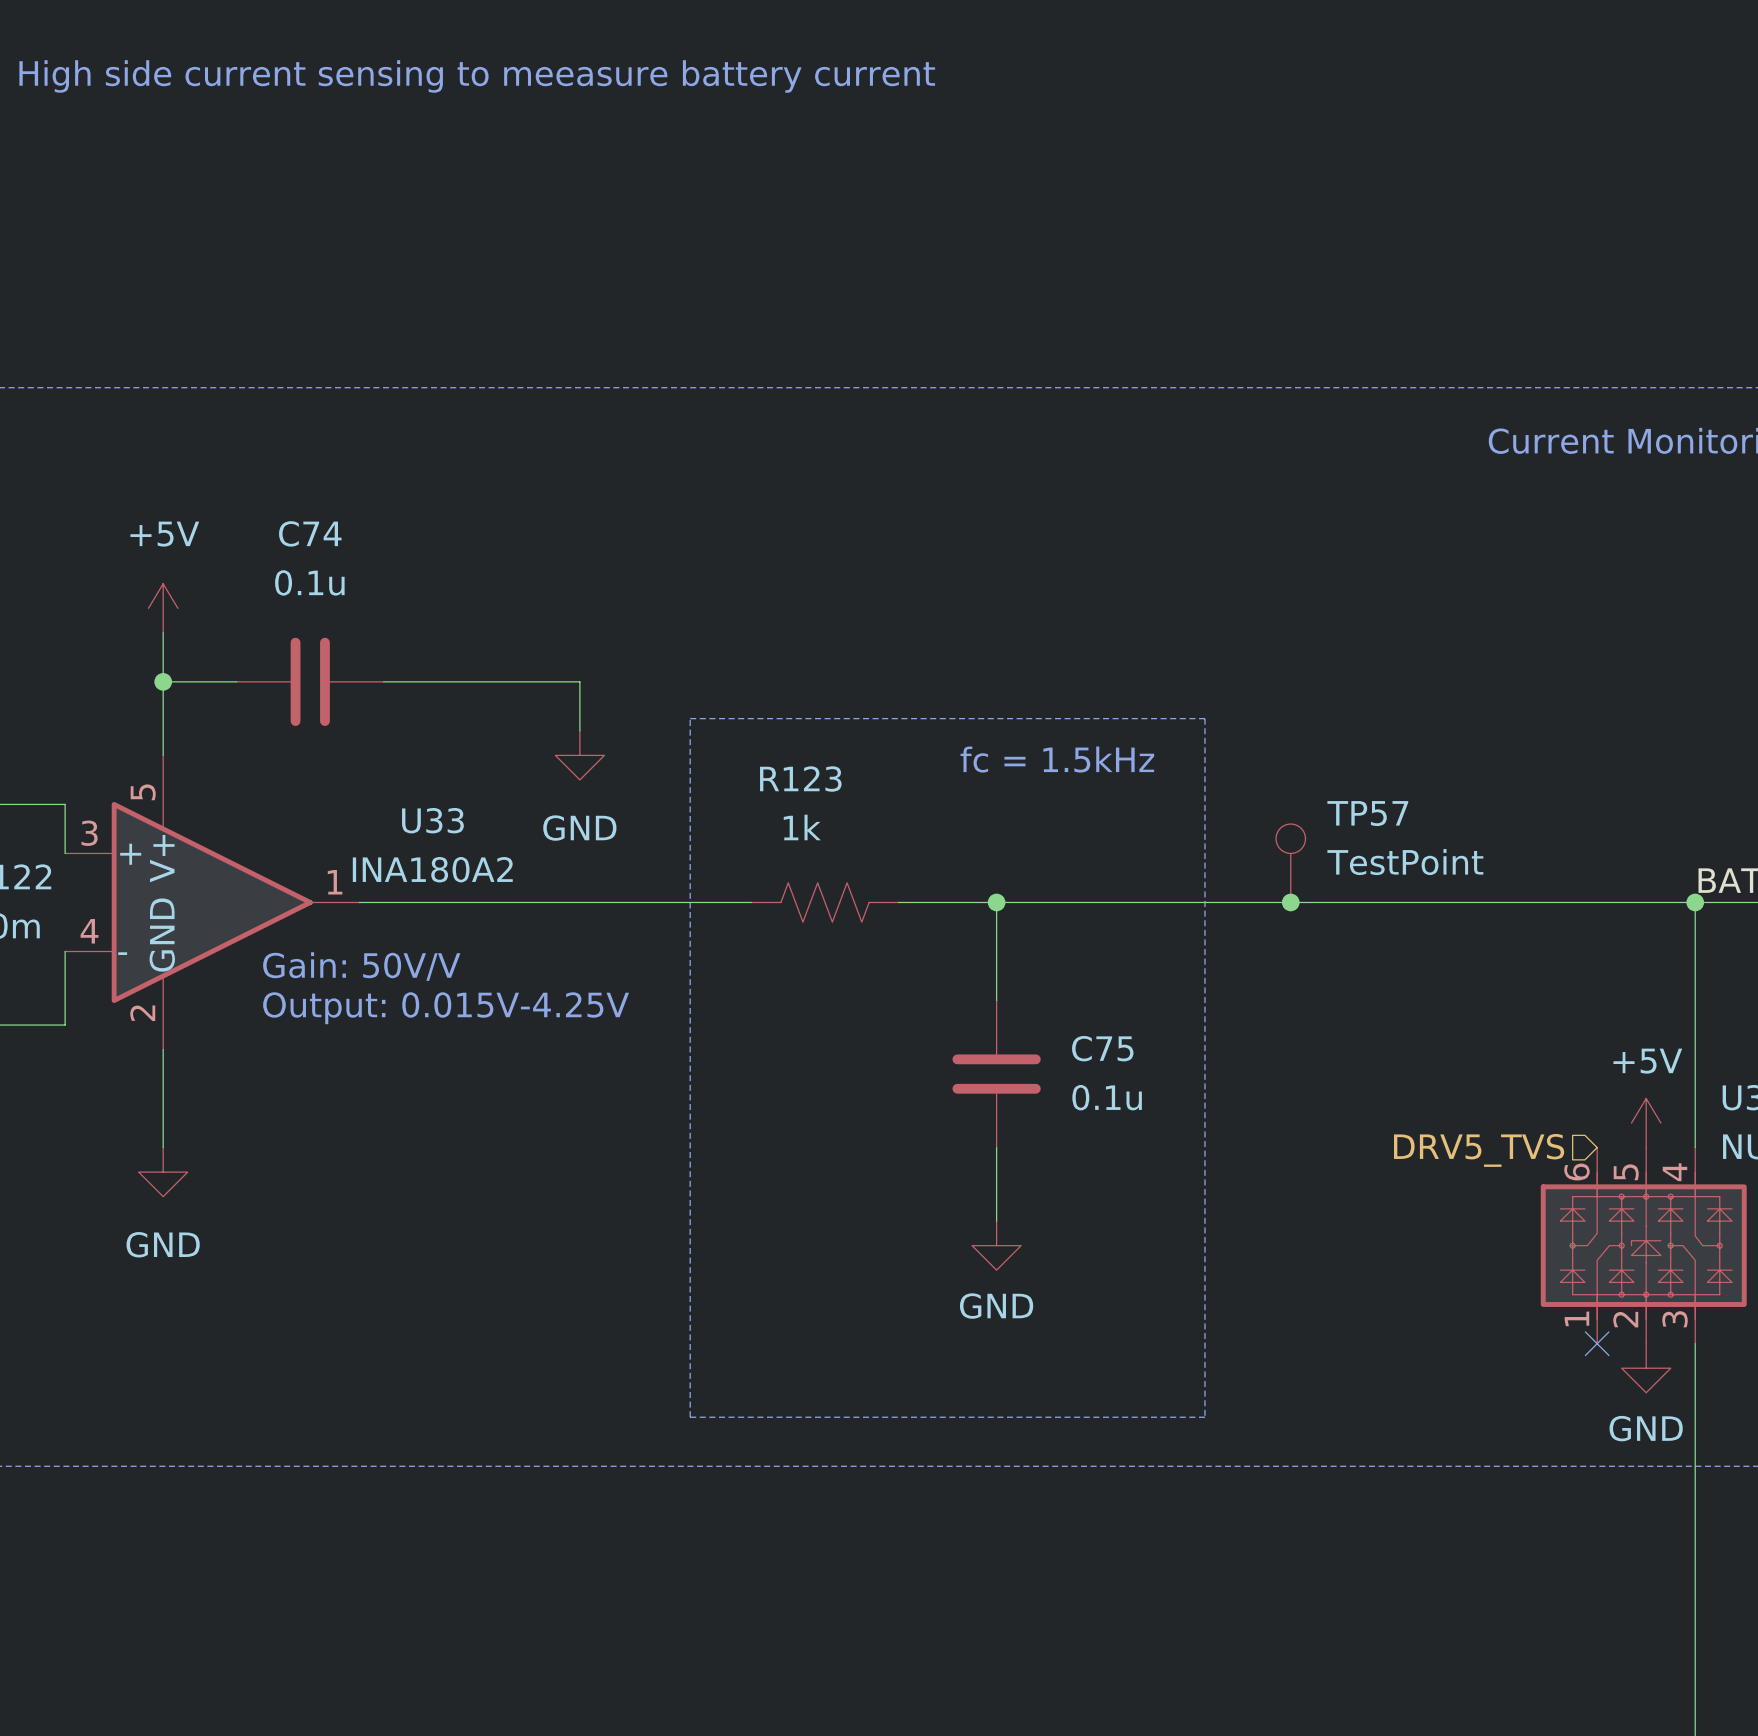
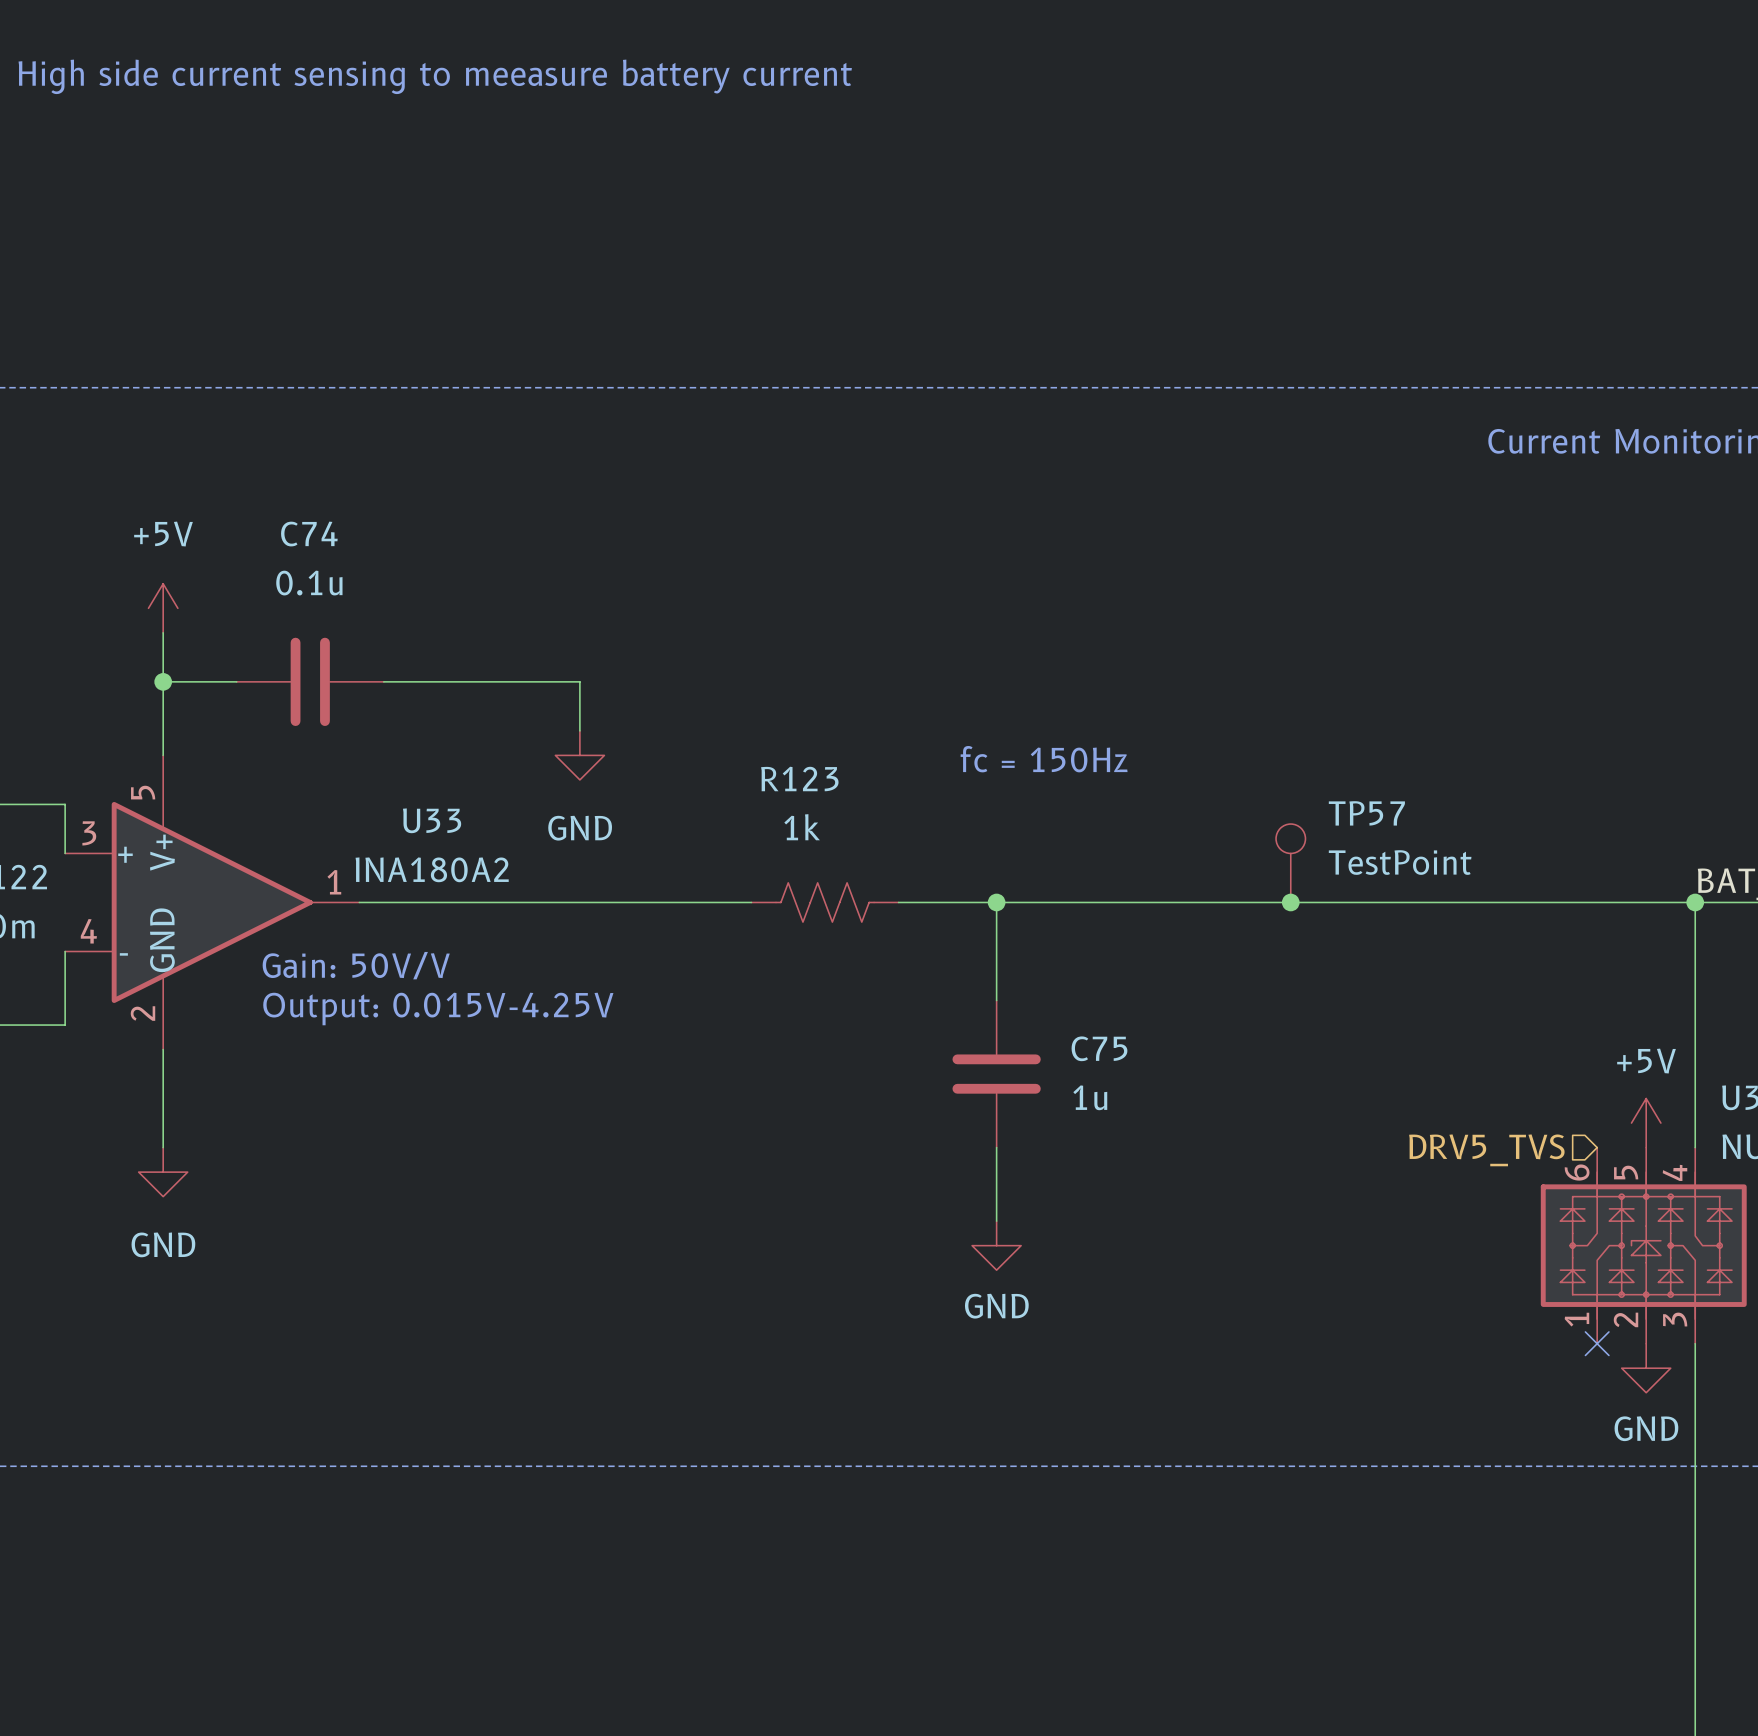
line: (690, 718) (1204, 718) (1204, 1417) (690, 1417) (690, 718) -> none
text: fc = 1.5kHz (1057, 759) -> fc = 150Hz (1044, 759)
C75 value: 0.1u (1107, 1097) -> 1u (1090, 1097)

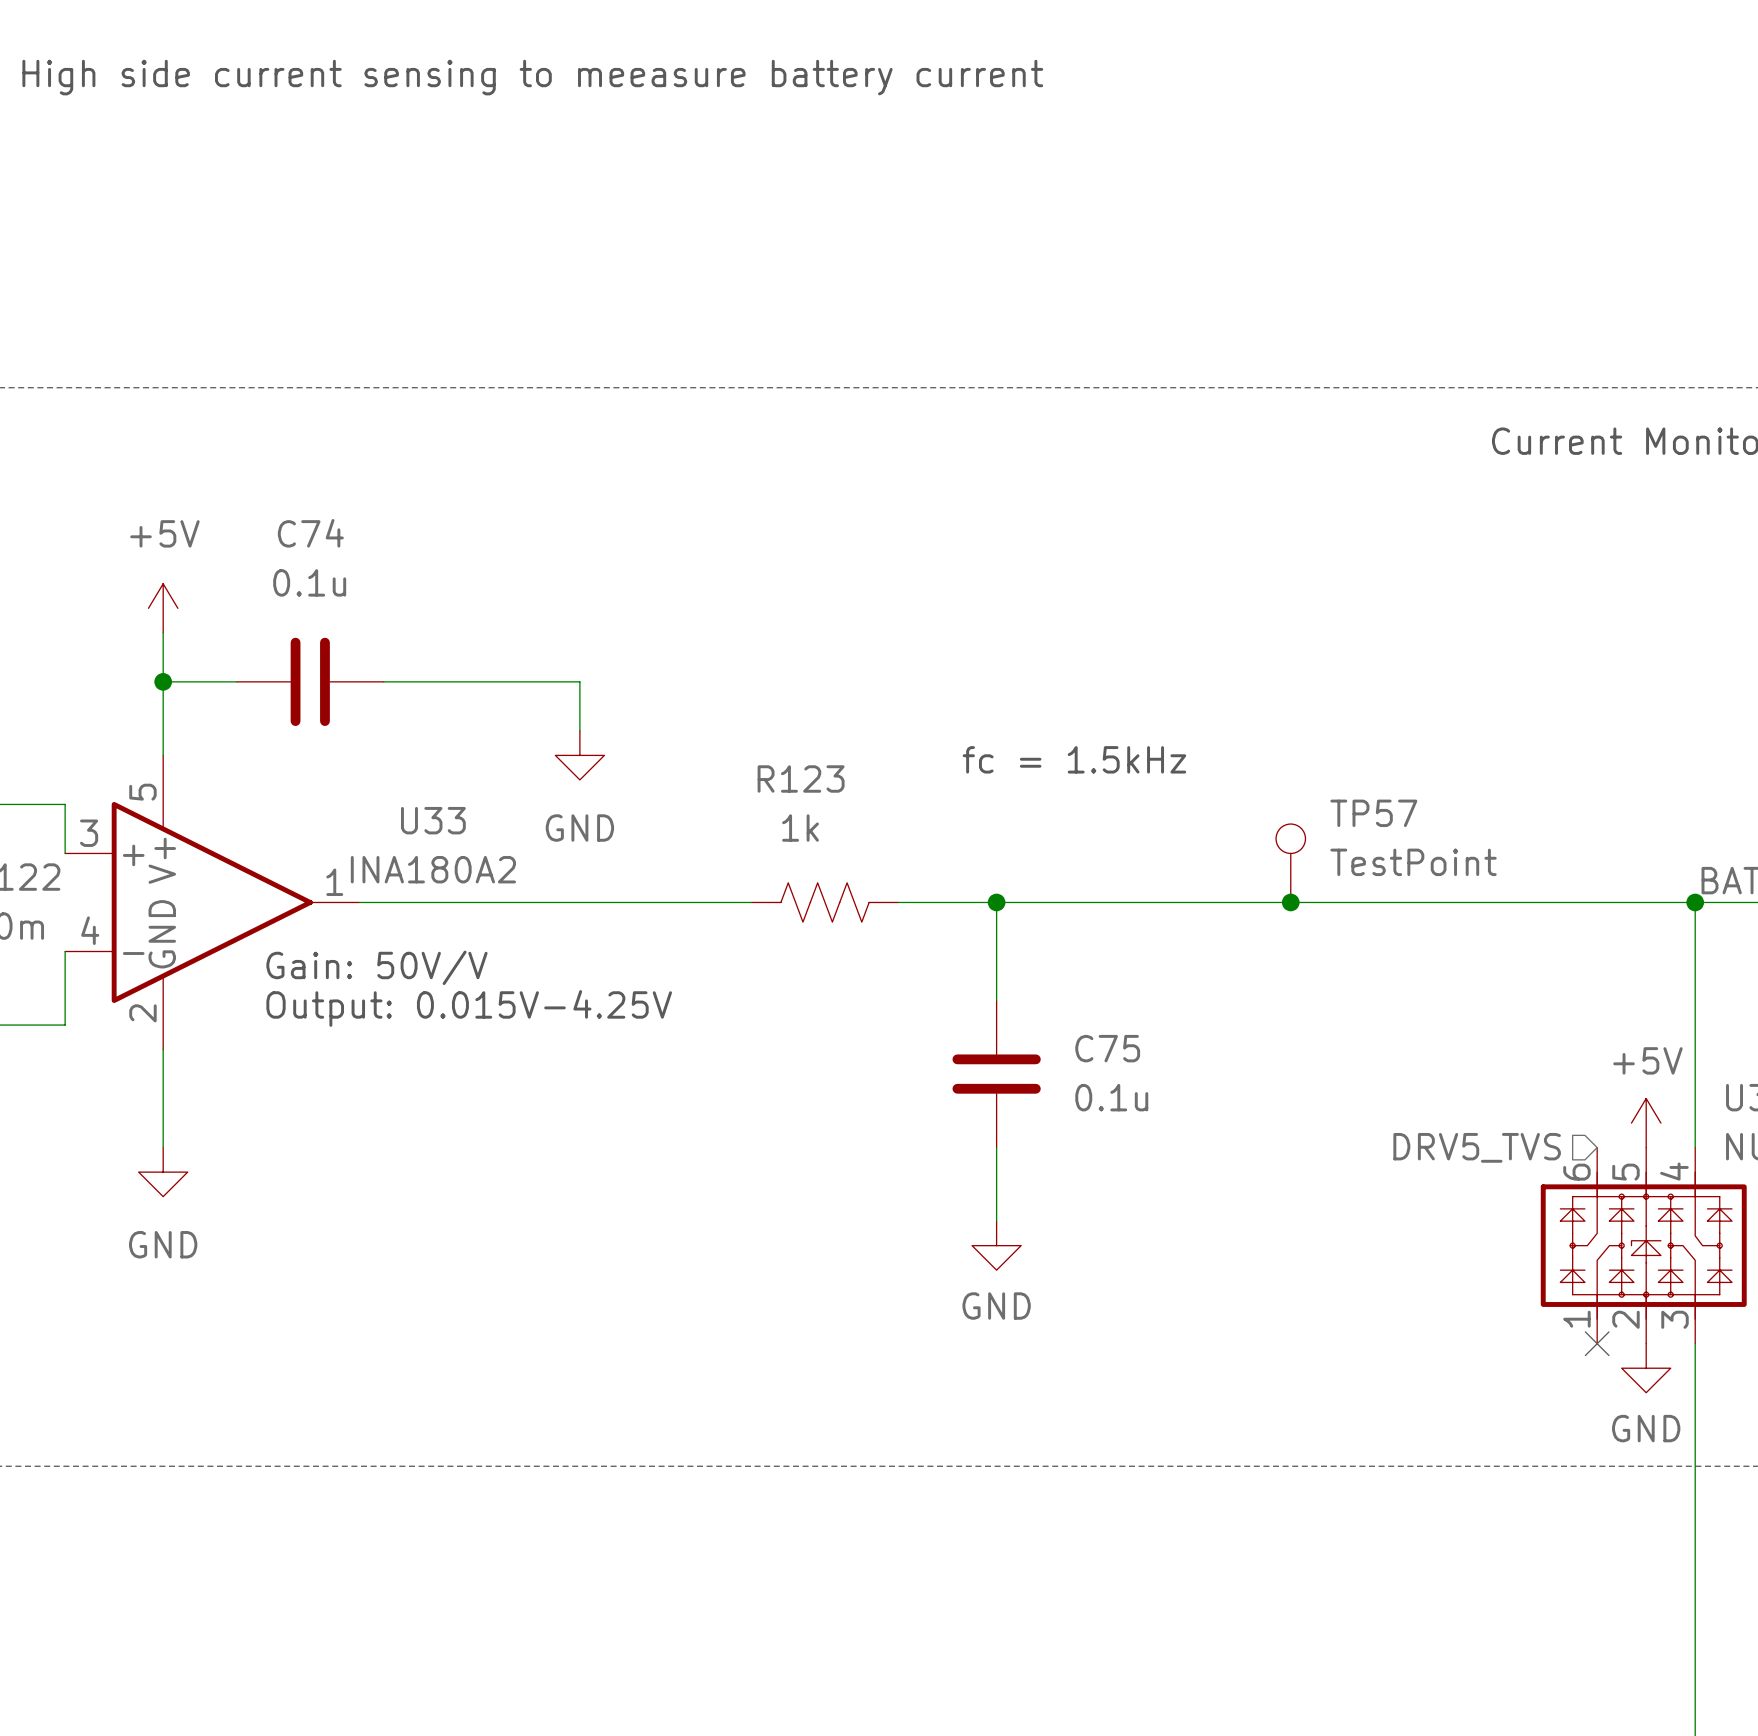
text: fc = 150Hz (1044, 759) -> fc = 1.5kHz (1074, 759)
C75 value: 1u (1090, 1097) -> 0.1u (1111, 1097)

